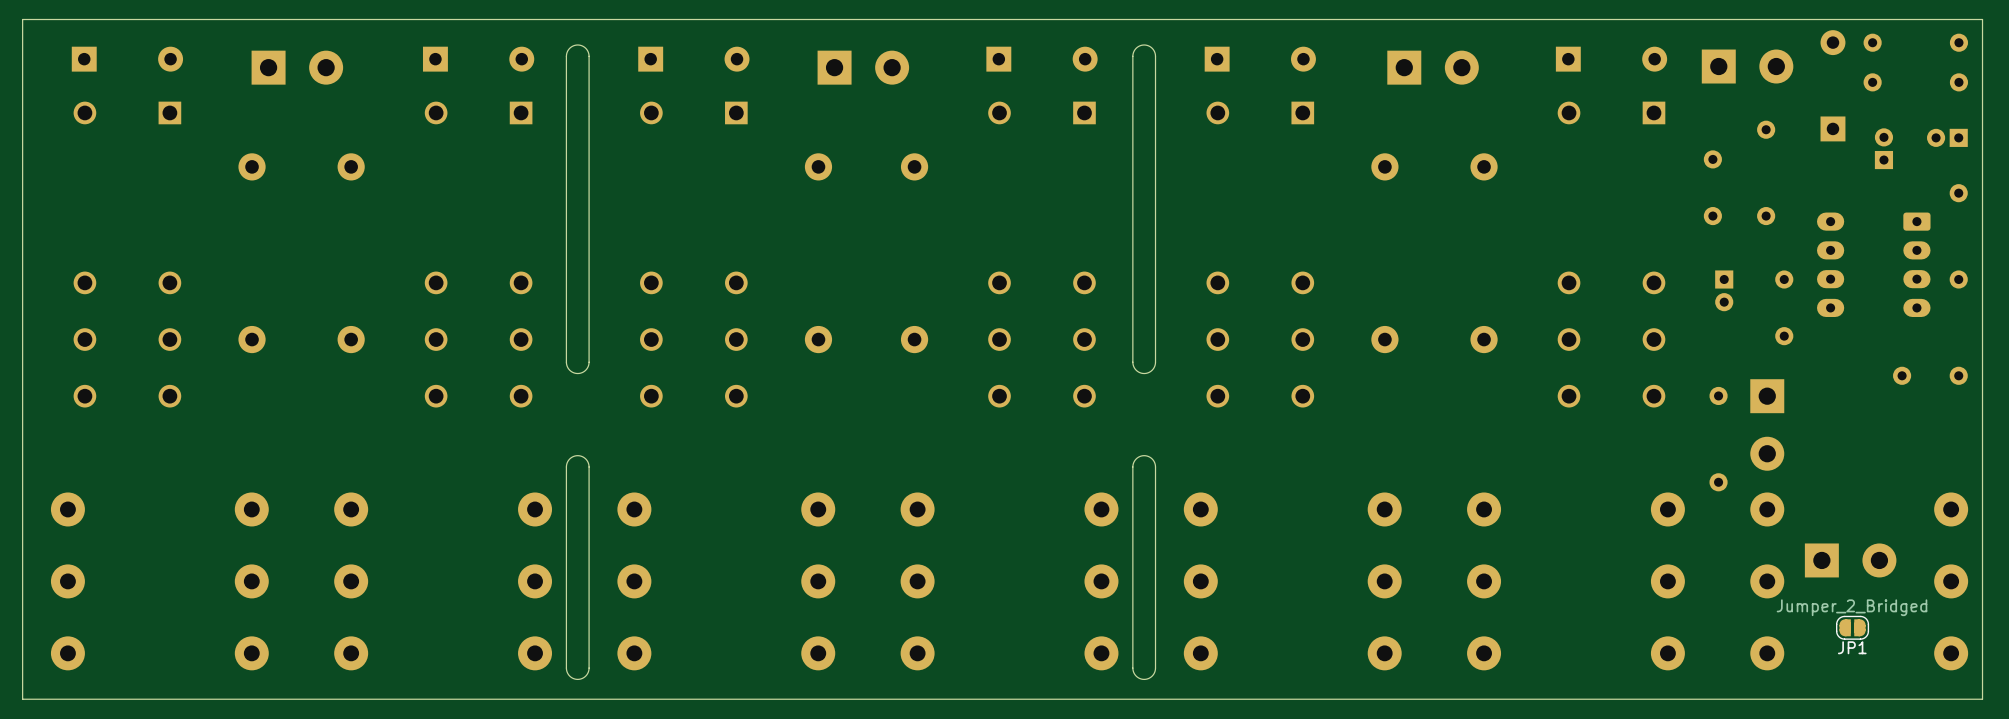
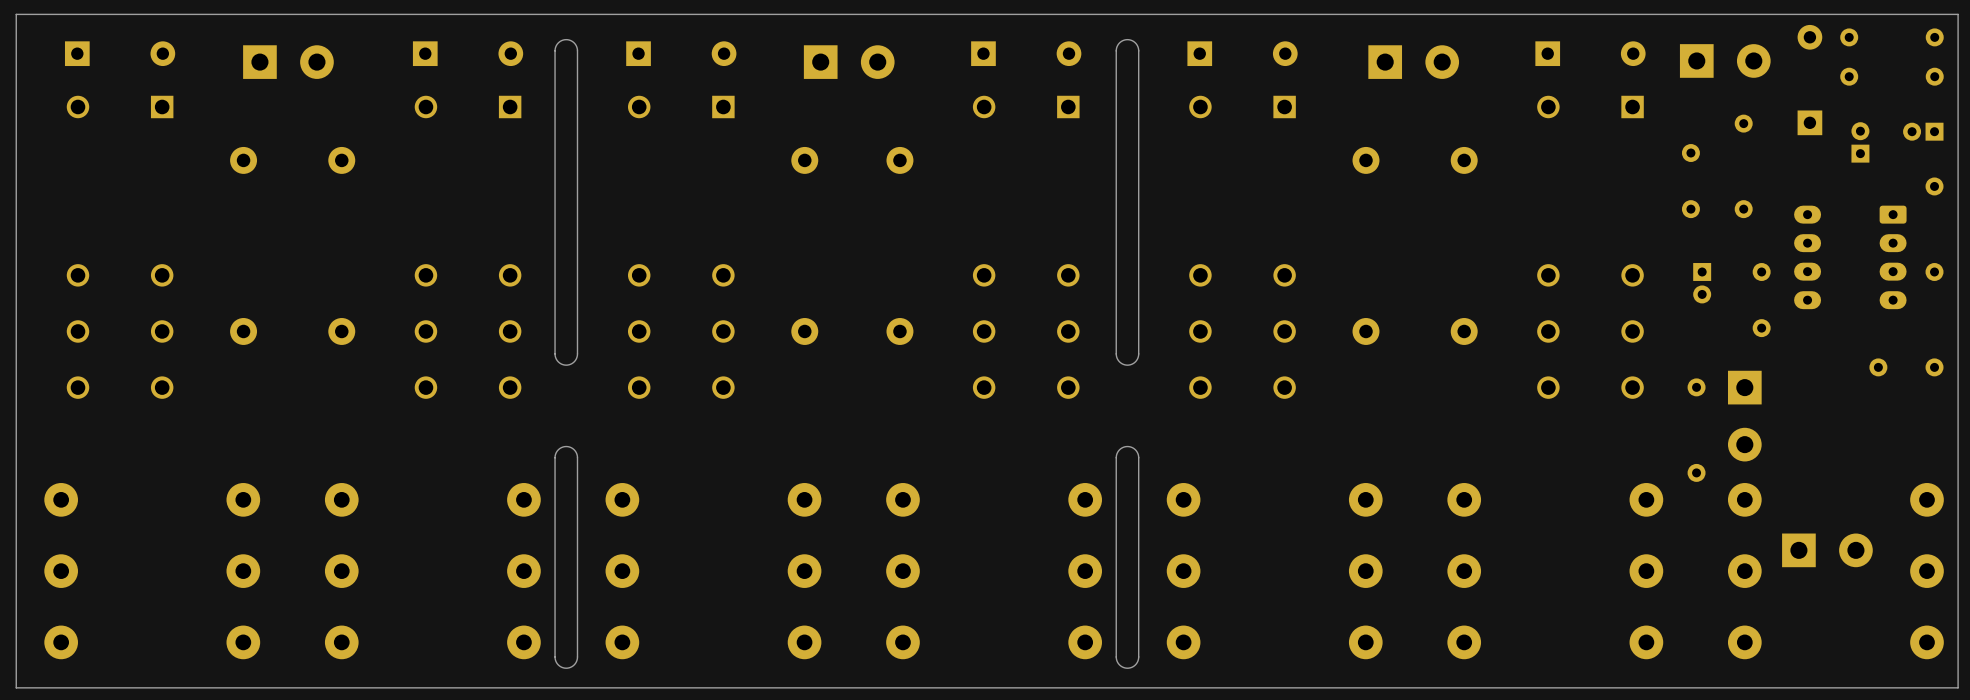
JP1: Jumper_2_Bridged (1852, 627) -> none

